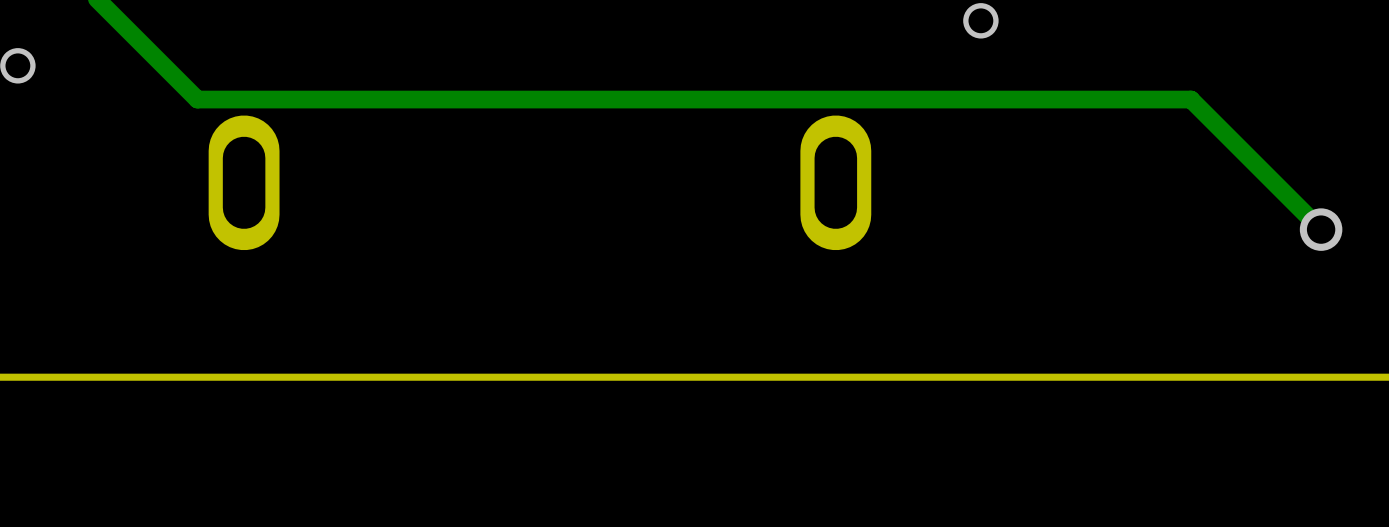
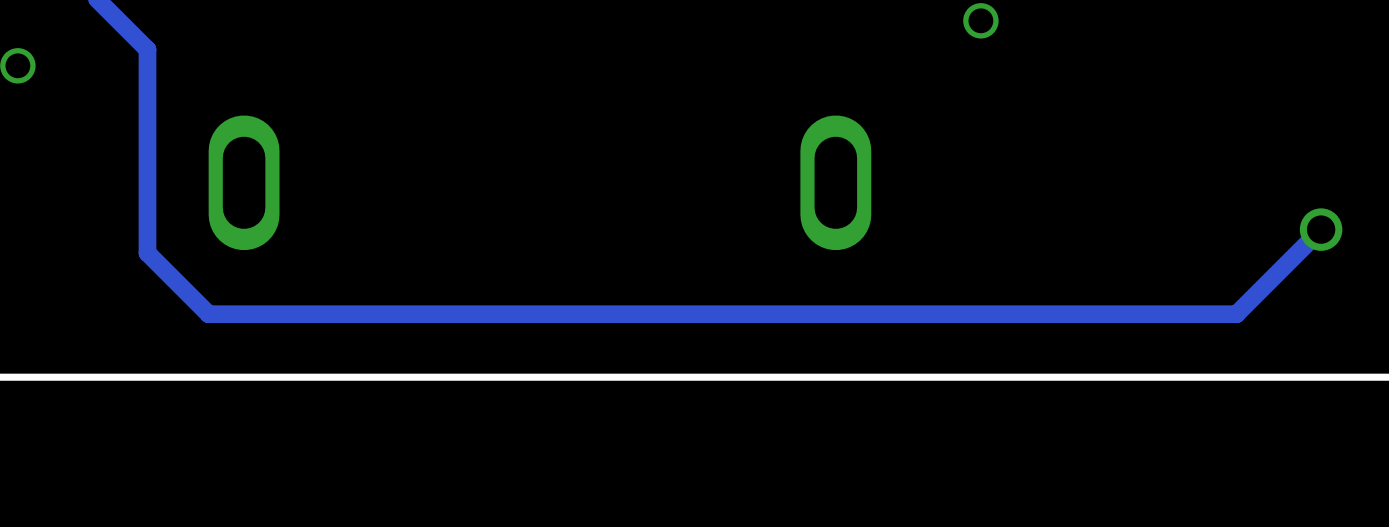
track: (147, 49) (197, 99) (1191, 99) (1321, 229) -> (147, 49) (147, 253) (208, 314) (1236, 314) (1321, 229)

